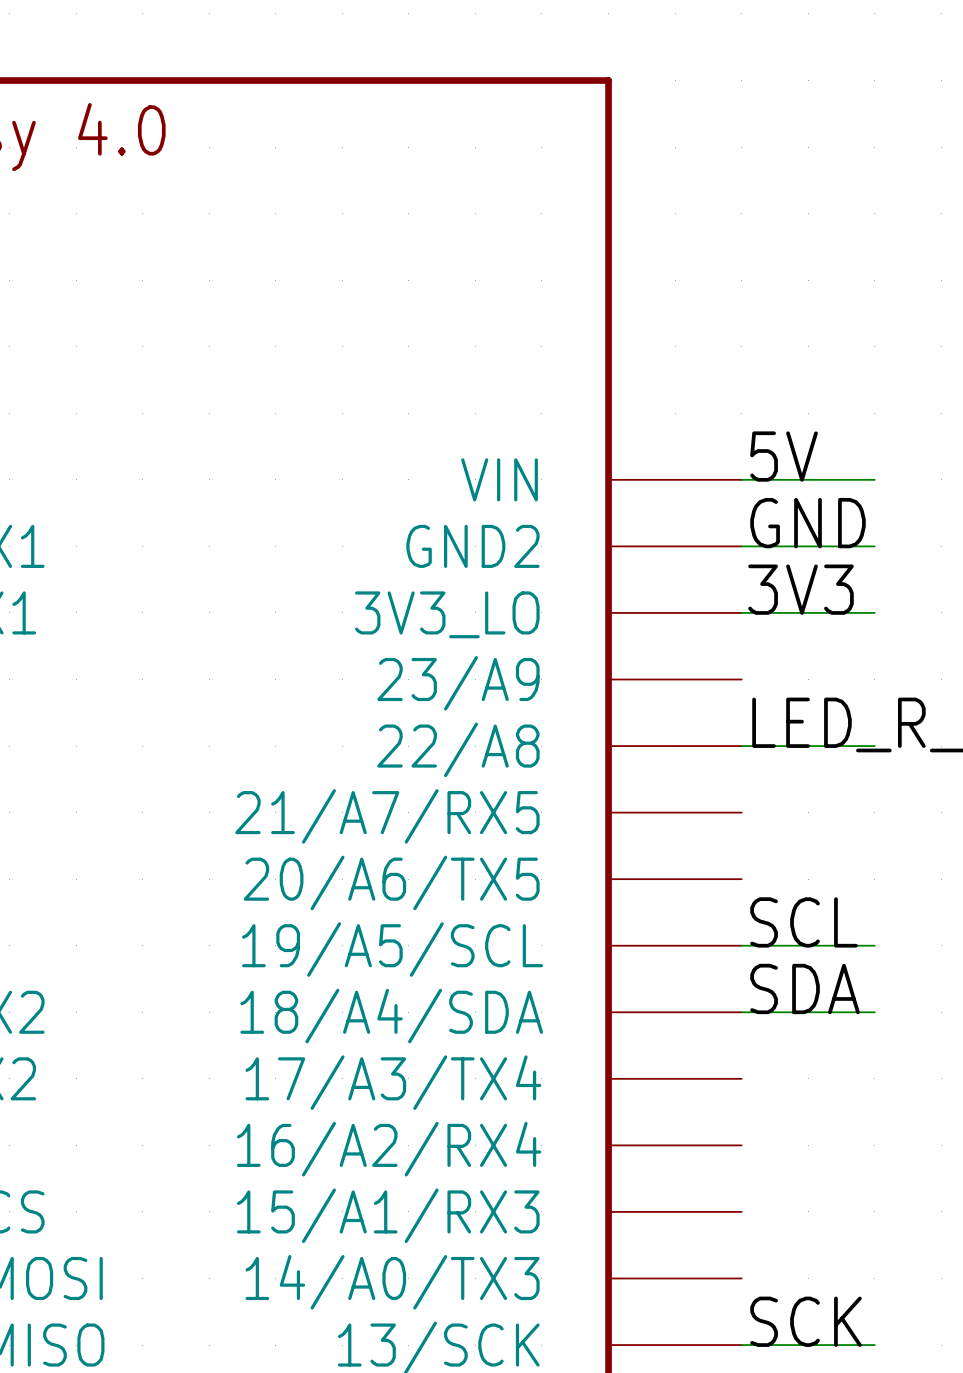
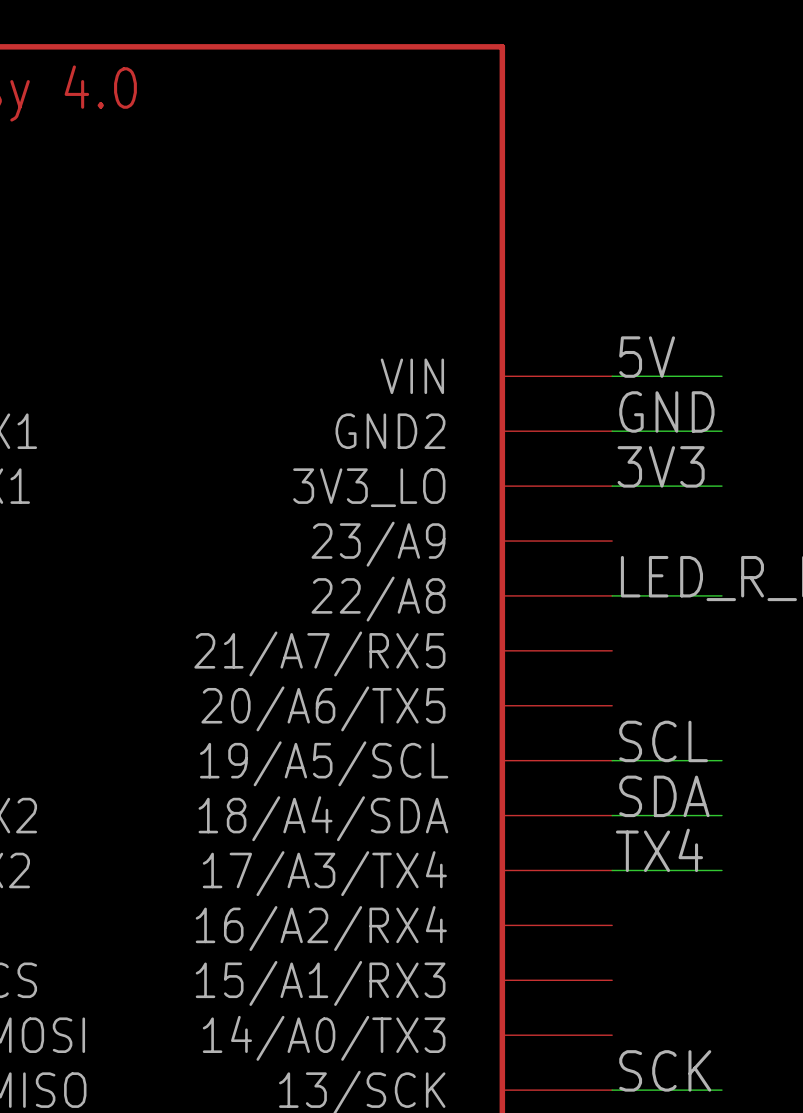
label: none -> TX4 (659, 850)
wire: none -> (612, 870) (721, 870)

